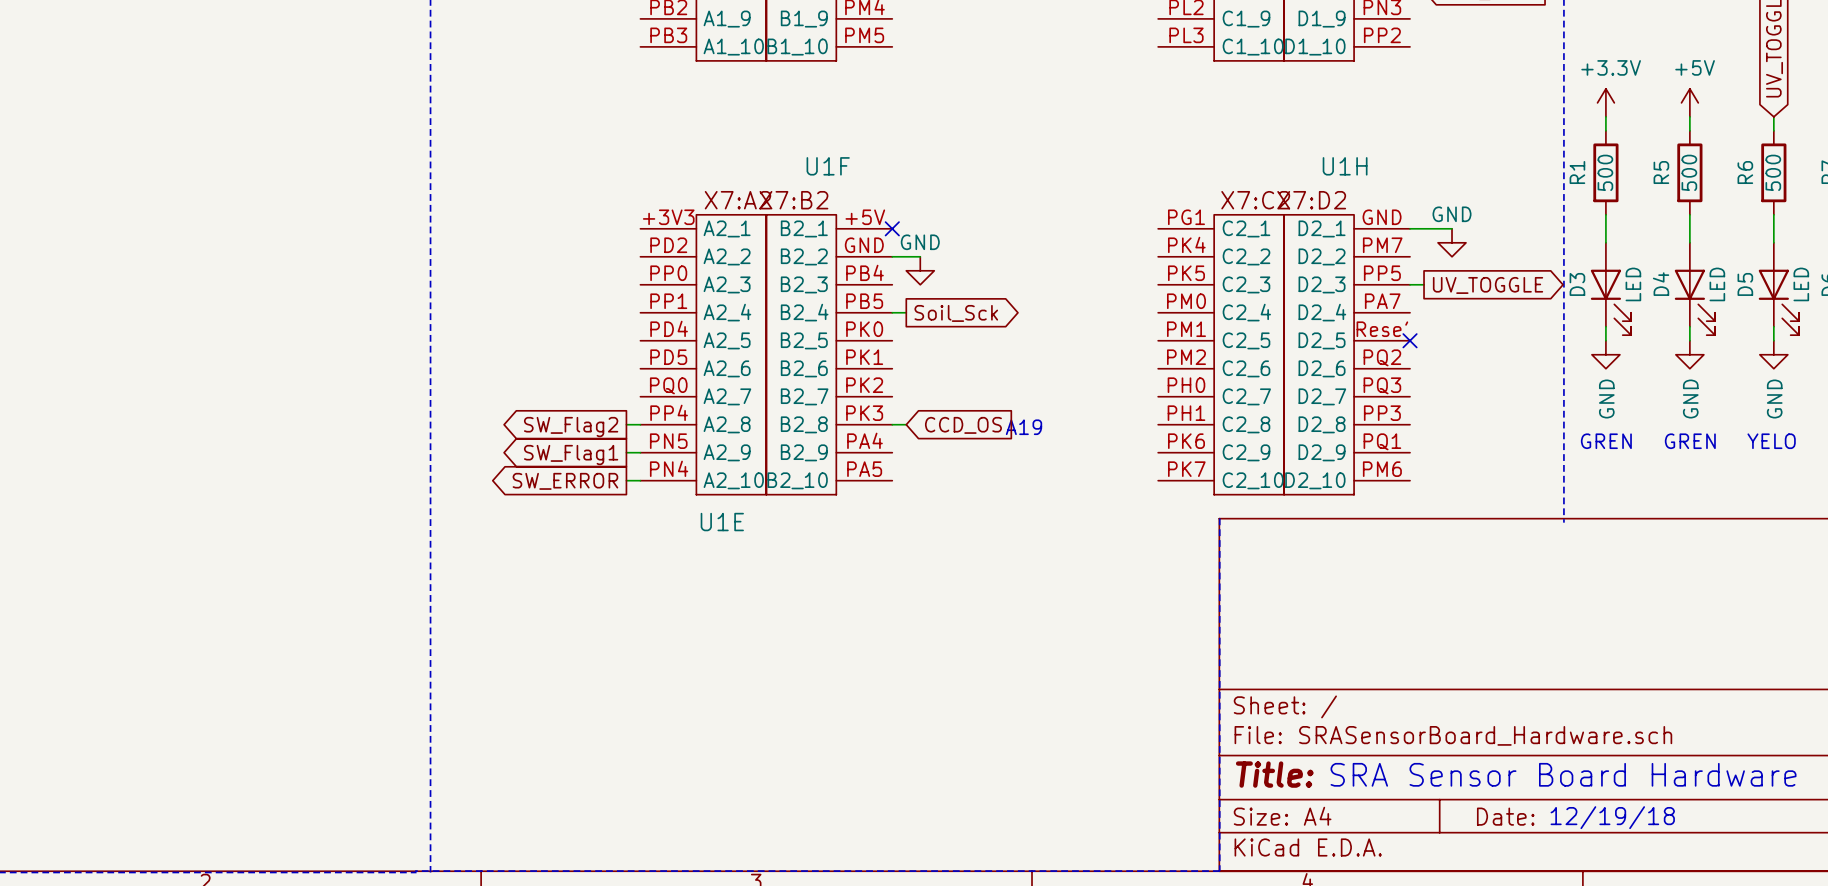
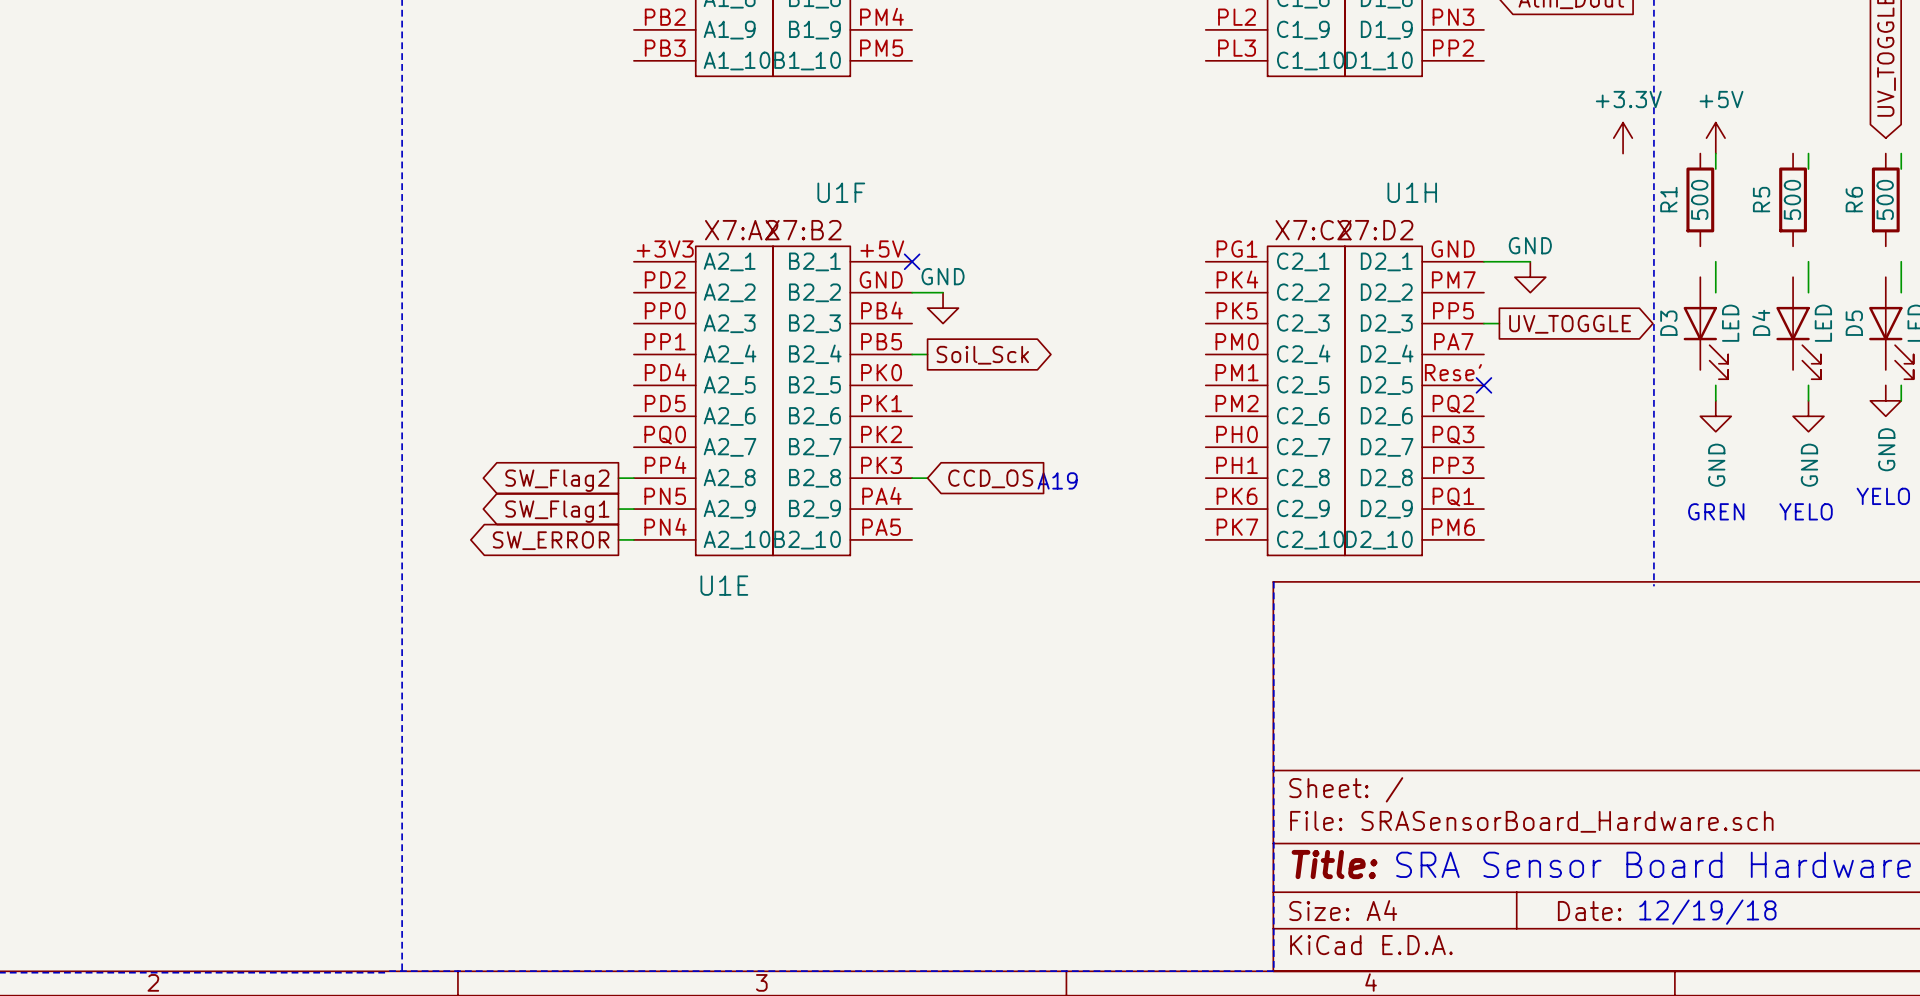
power symbol position: +3.3V (1605, 102) -> +3.3V (1623, 138)
power symbol position: +5V (1689, 102) -> +5V (1715, 138)
wire: (1605, 116) (1605, 130) -> (1715, 153) (1715, 169)
wire: (1689, 116) (1689, 130) -> (1808, 153) (1808, 169)
wire: (1773, 116) (1773, 130) -> (1901, 153) (1901, 169)
wire: (1605, 214) (1605, 242) -> (1715, 261) (1715, 292)
wire: (1689, 214) (1689, 242) -> (1808, 261) (1808, 292)
wire: (1773, 214) (1773, 242) -> (1901, 261) (1901, 292)
wire: (1605, 326) (1605, 340) -> (1715, 385) (1715, 400)
wire: (1689, 326) (1689, 340) -> (1808, 385) (1808, 400)
wire: (1773, 326) (1773, 340) -> (1901, 385) (1901, 400)
power symbol position: GND (1605, 354) -> GND (1715, 416)
power symbol position: GND (1689, 354) -> GND (1808, 416)
text position: GREN (1606, 441) -> GREN (1716, 511)
text: GREN (1690, 441) -> none
text: none -> YELO (1806, 511)

